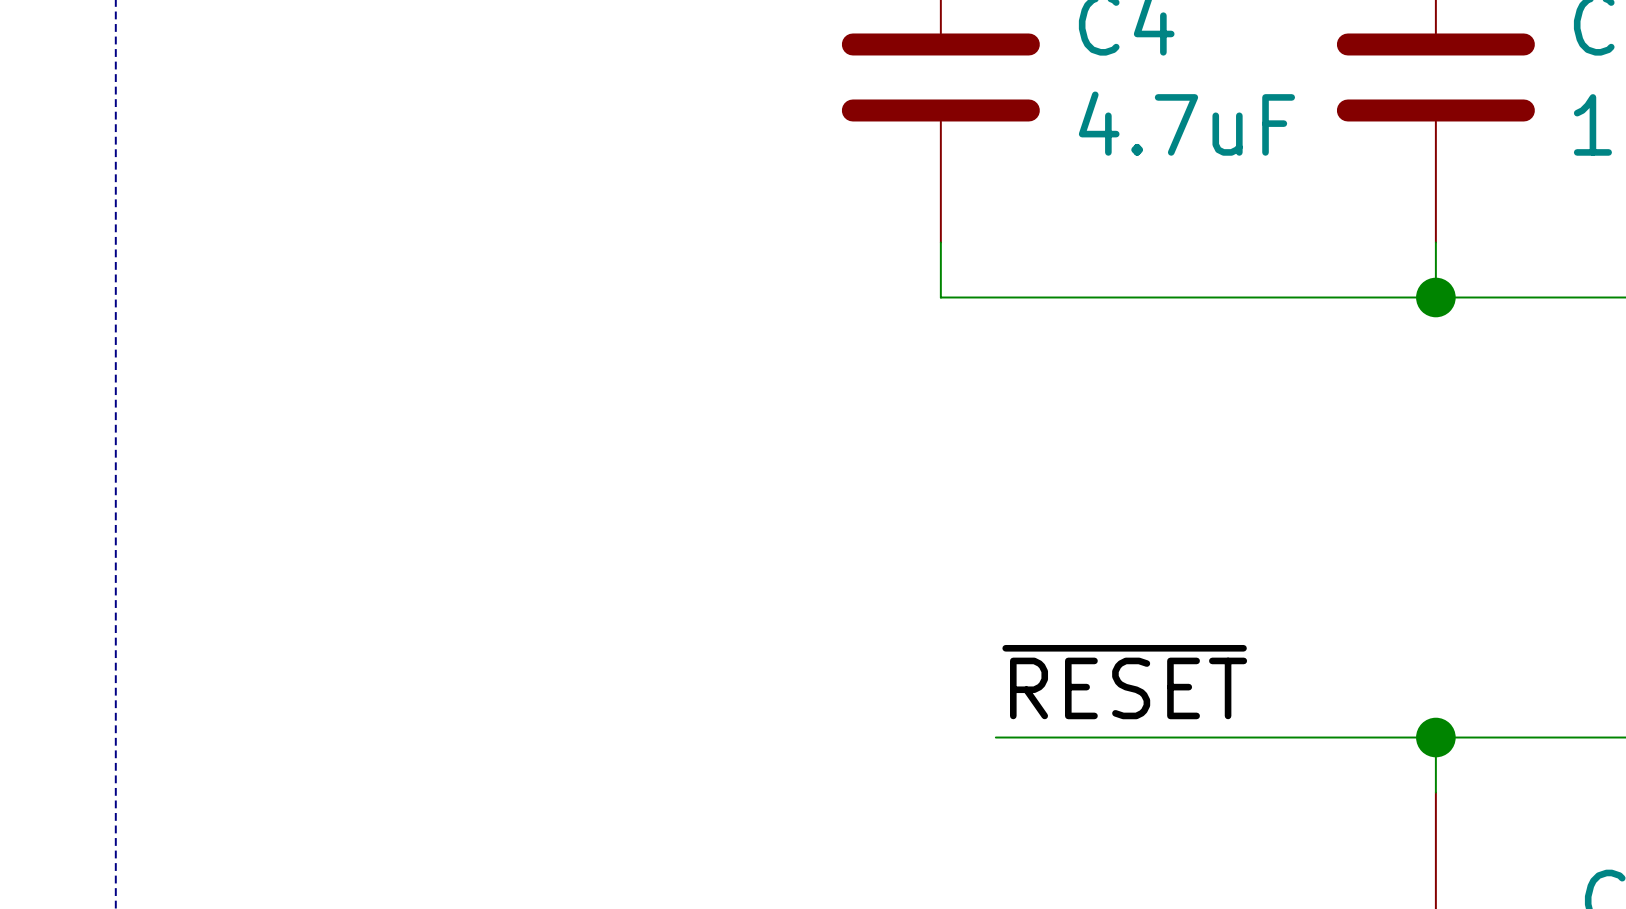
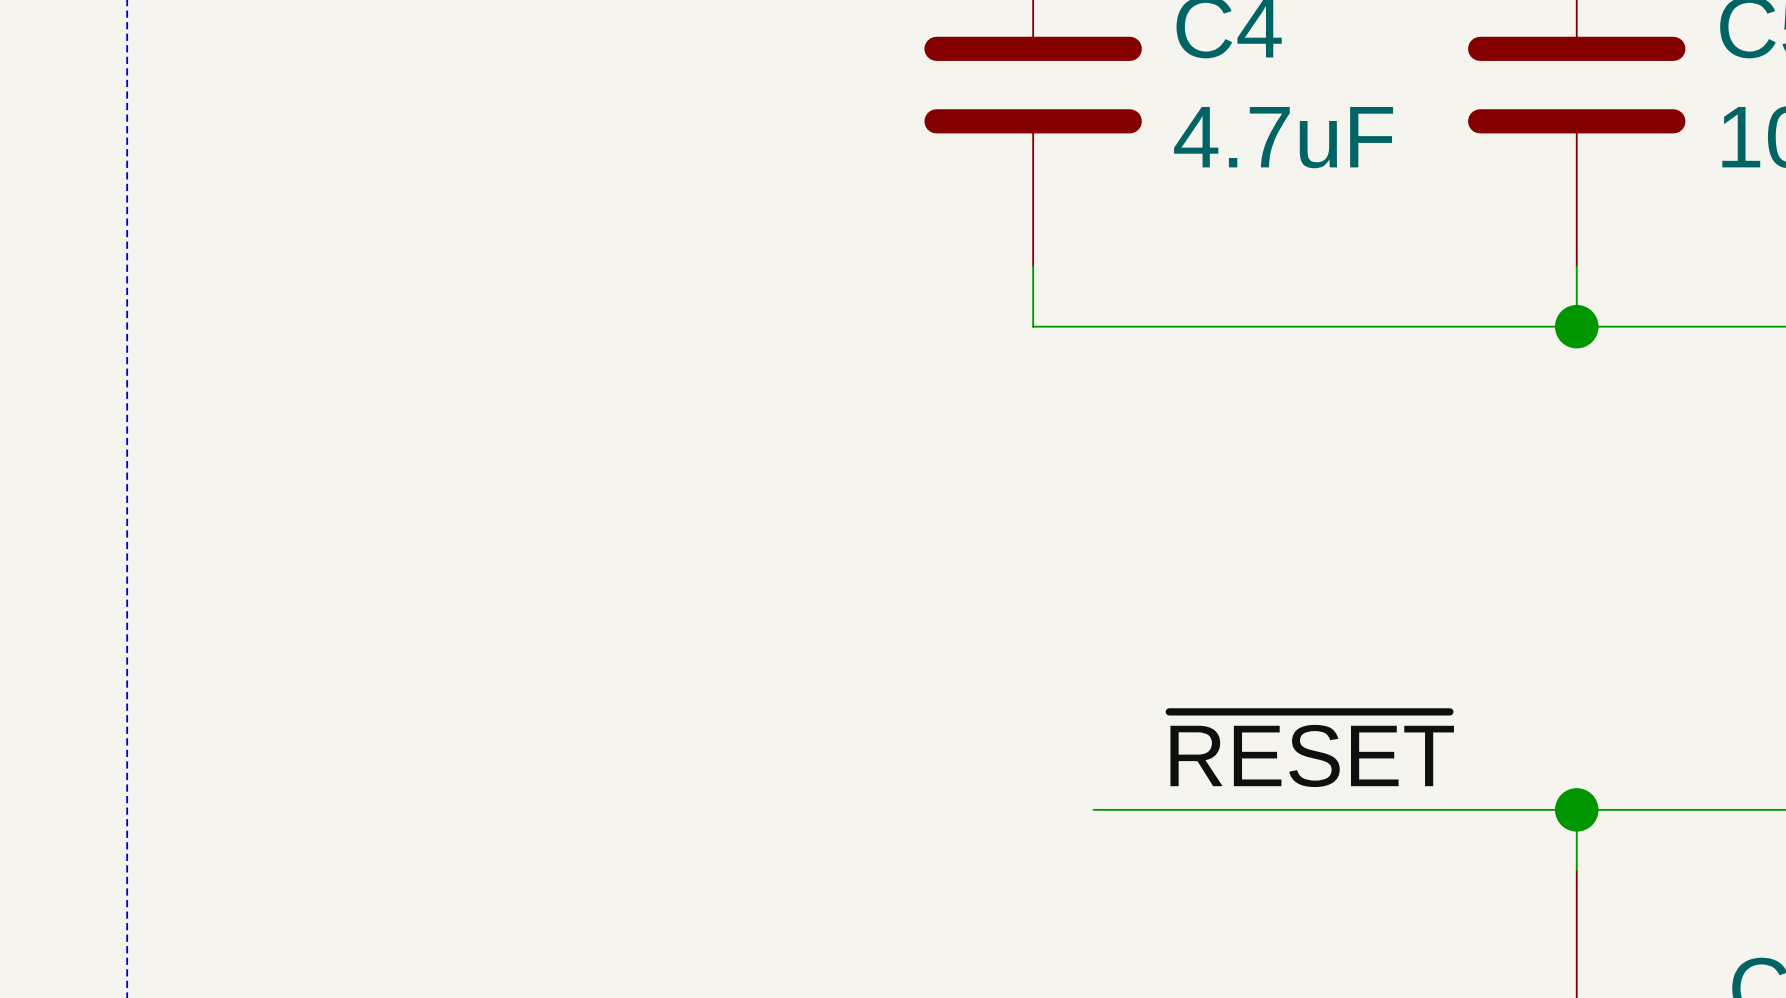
label position: ~{RESET} (1124, 682) -> ~{RESET} (1311, 749)

